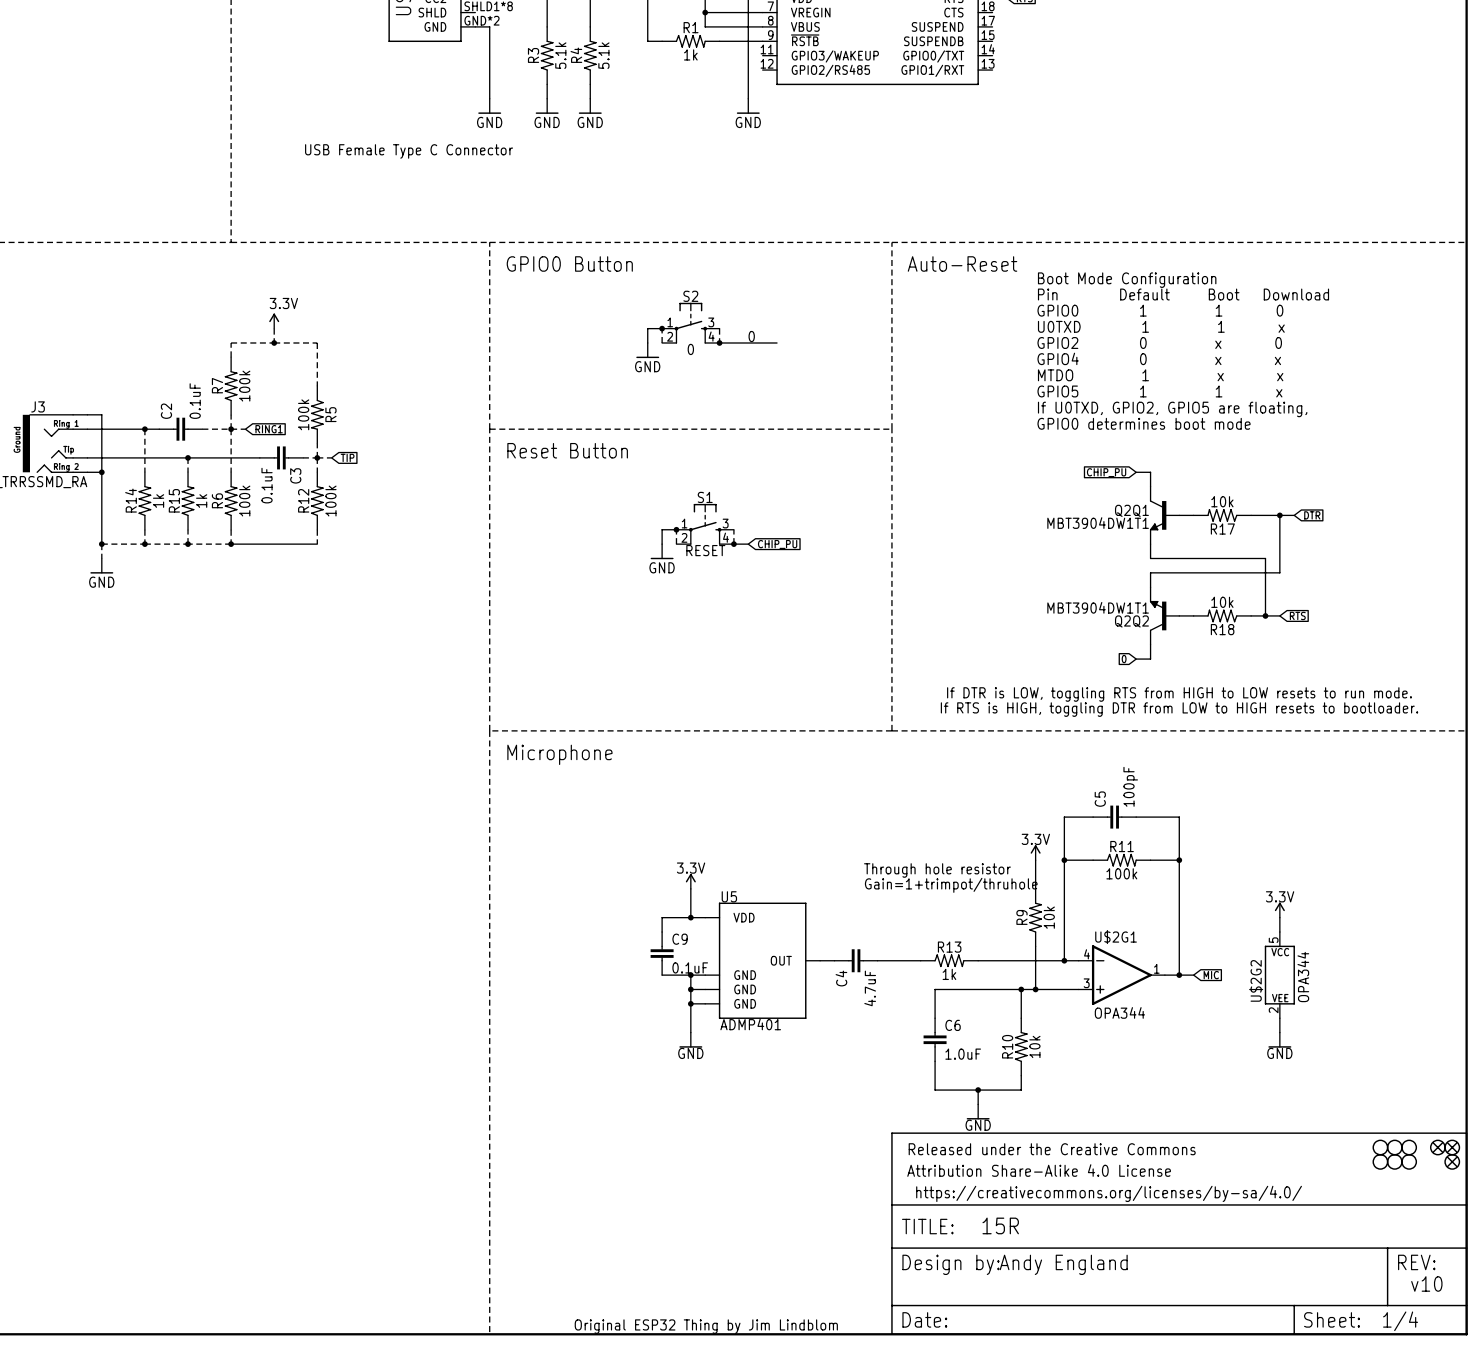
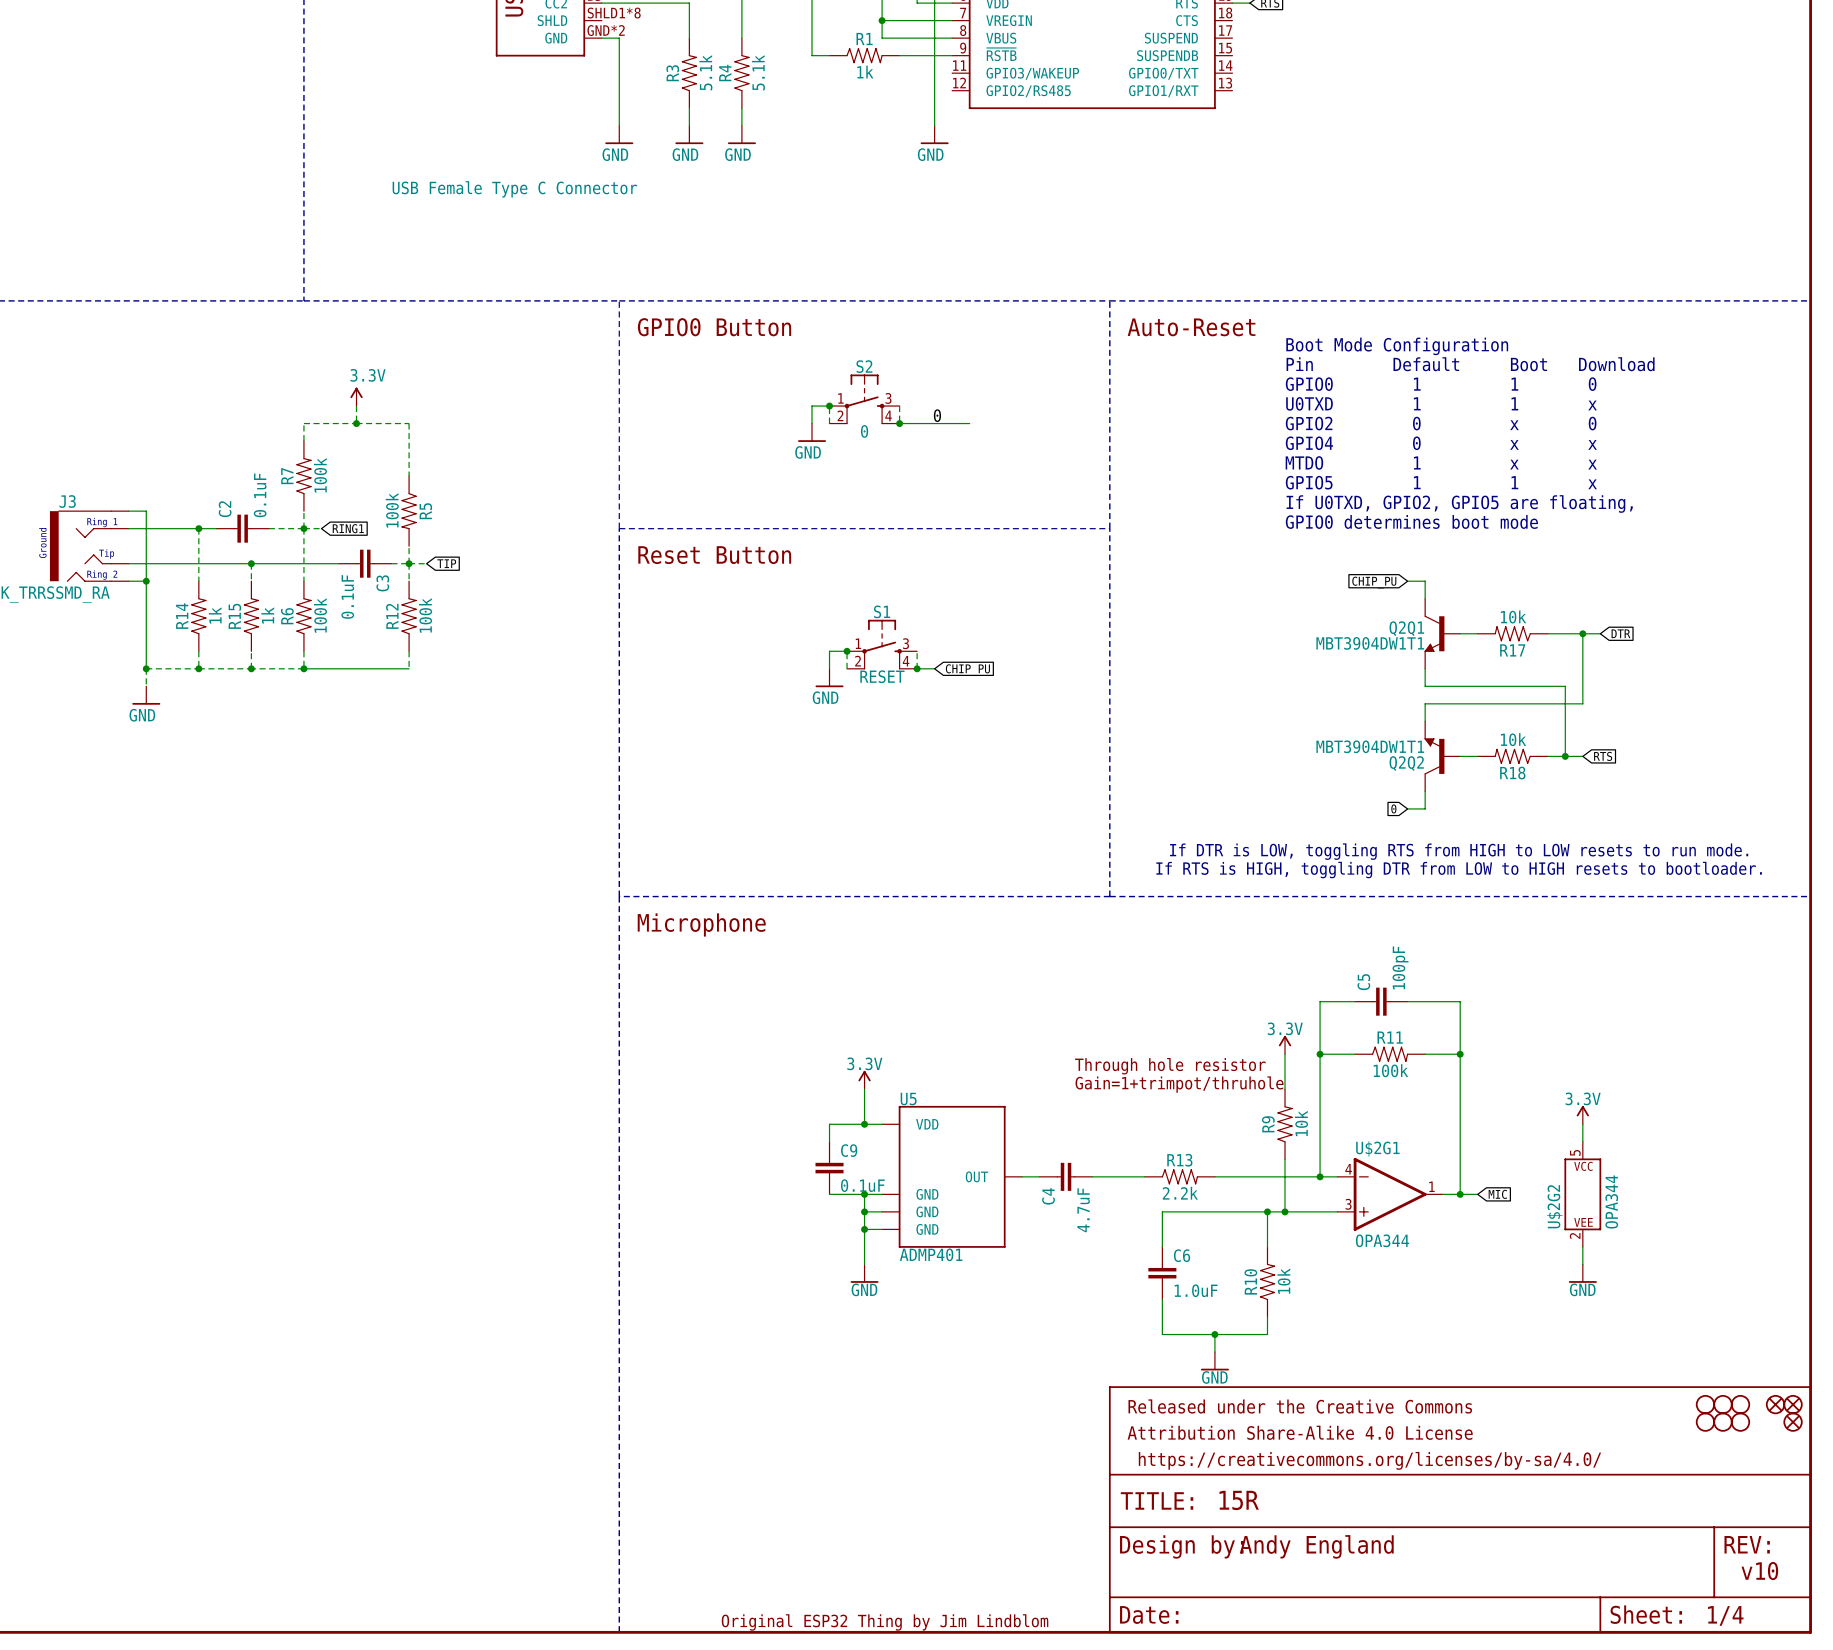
R13 value: 1k (949, 974) -> 2.2k (1180, 1193)

